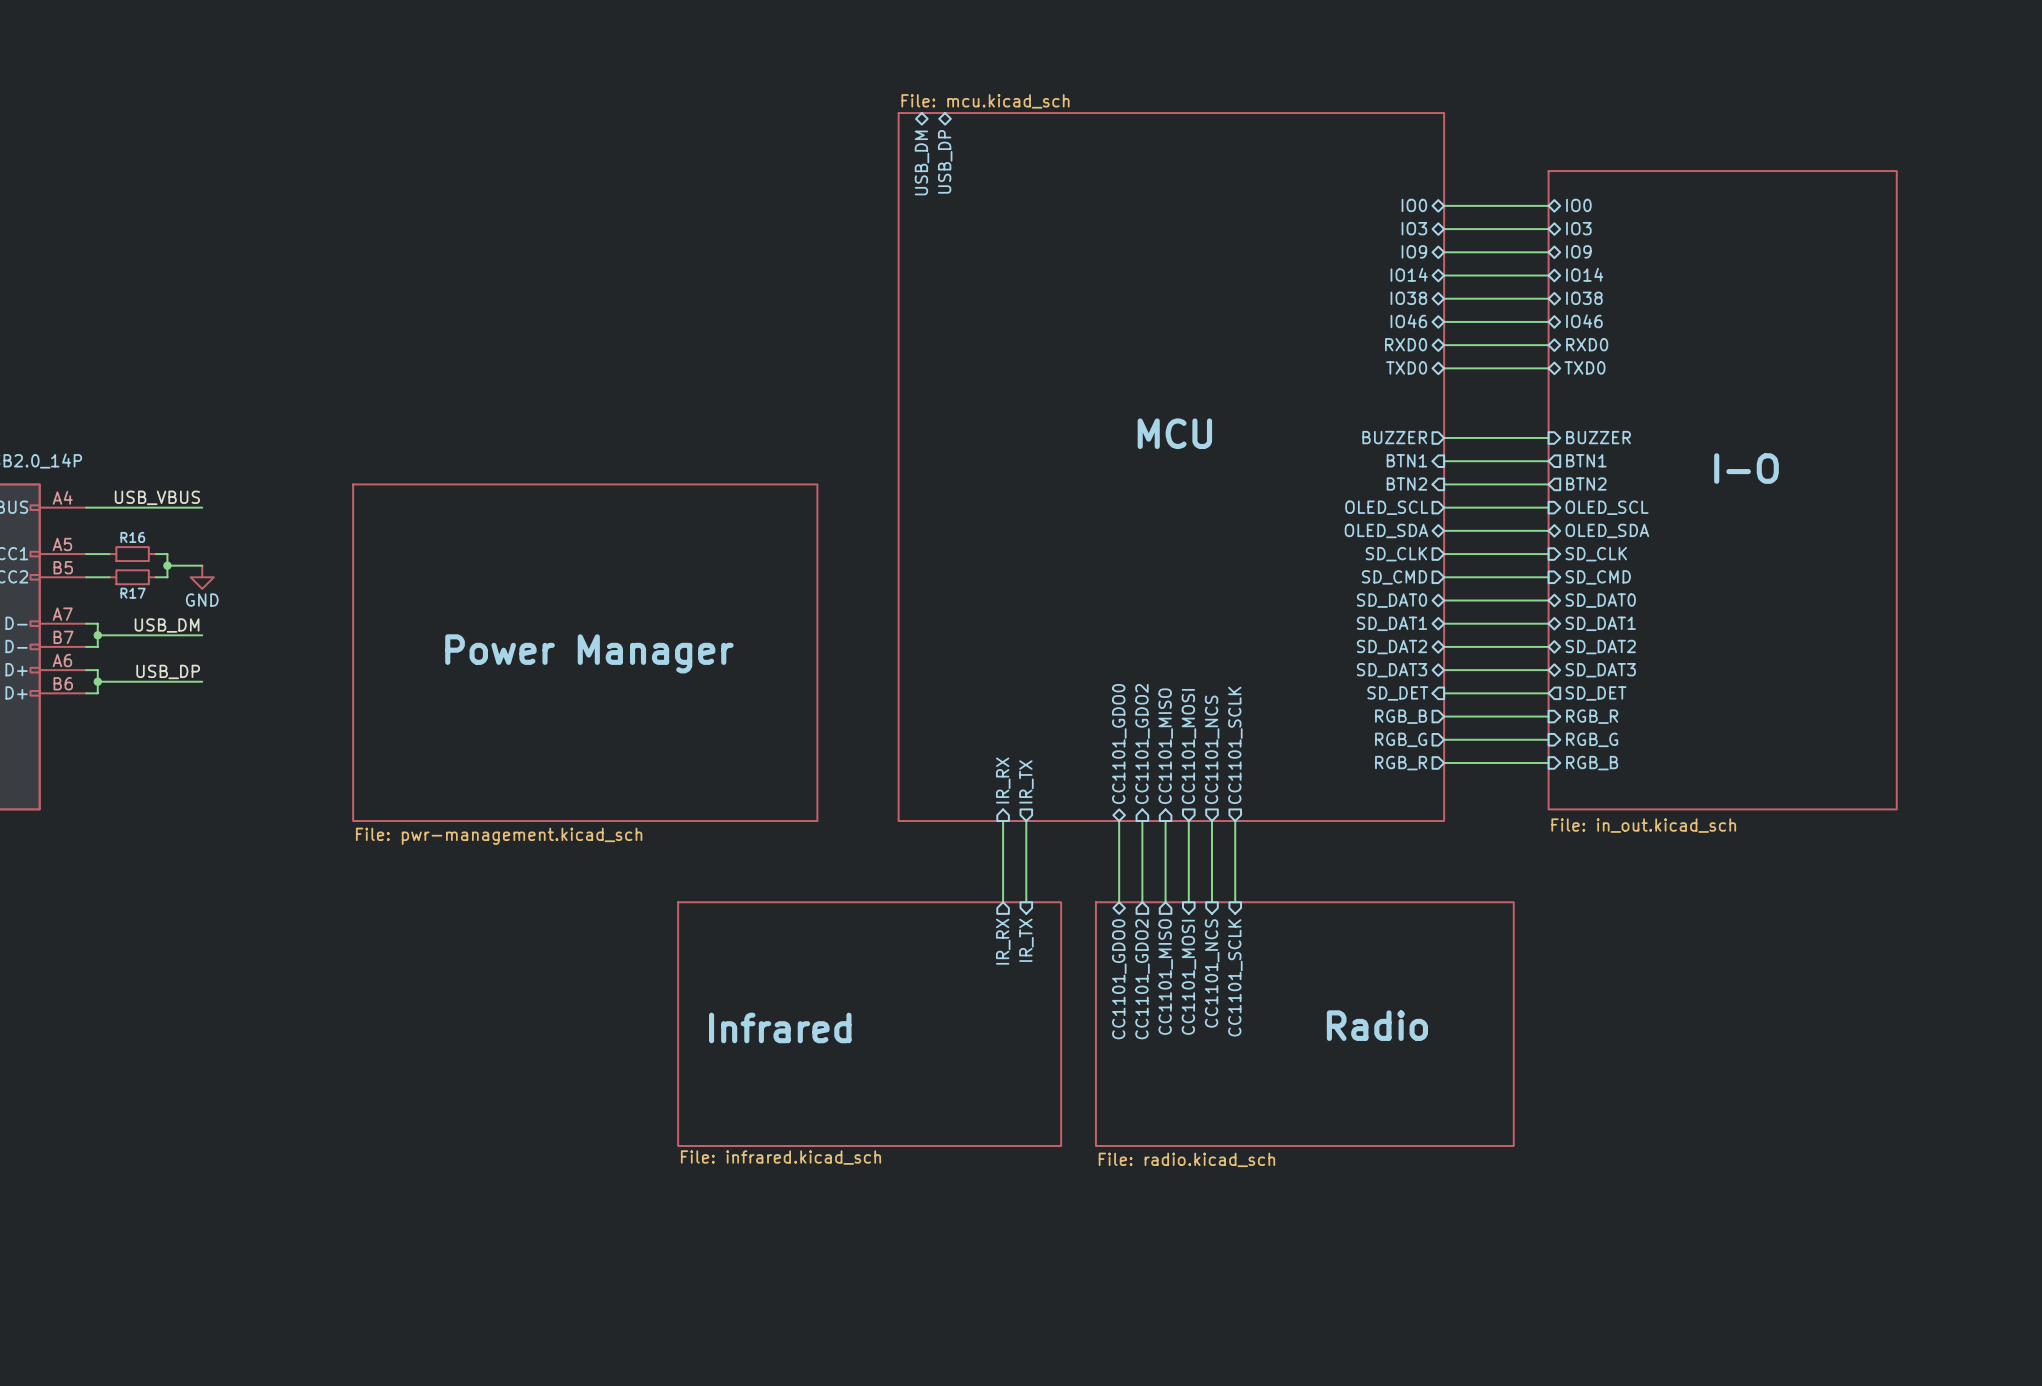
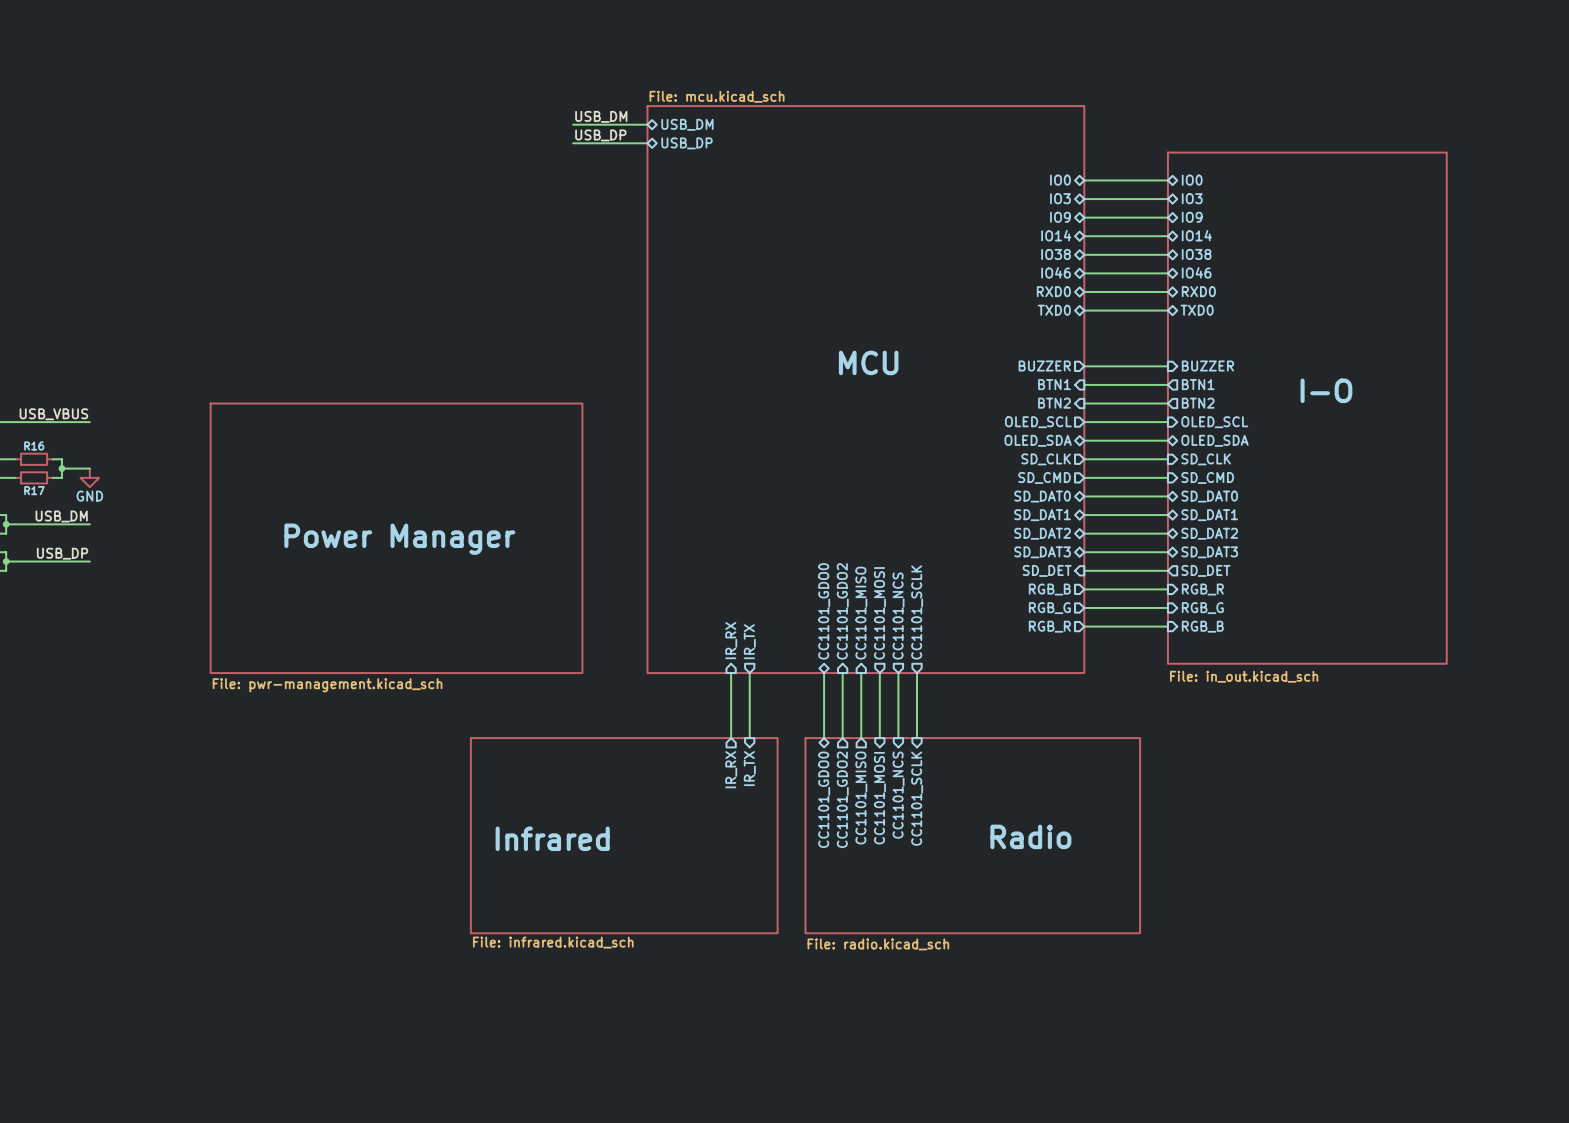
label: none -> USB_DM (601, 116)
wire: none -> (573, 124) (647, 124)
label: none -> USB_DP (600, 135)
wire: none -> (573, 143) (647, 143)
sheet pin rotation: 0° (945, 161) -> 90° counterclockwise (687, 143)
sheet pin rotation: 0° (921, 162) -> 90° counterclockwise (687, 124)

